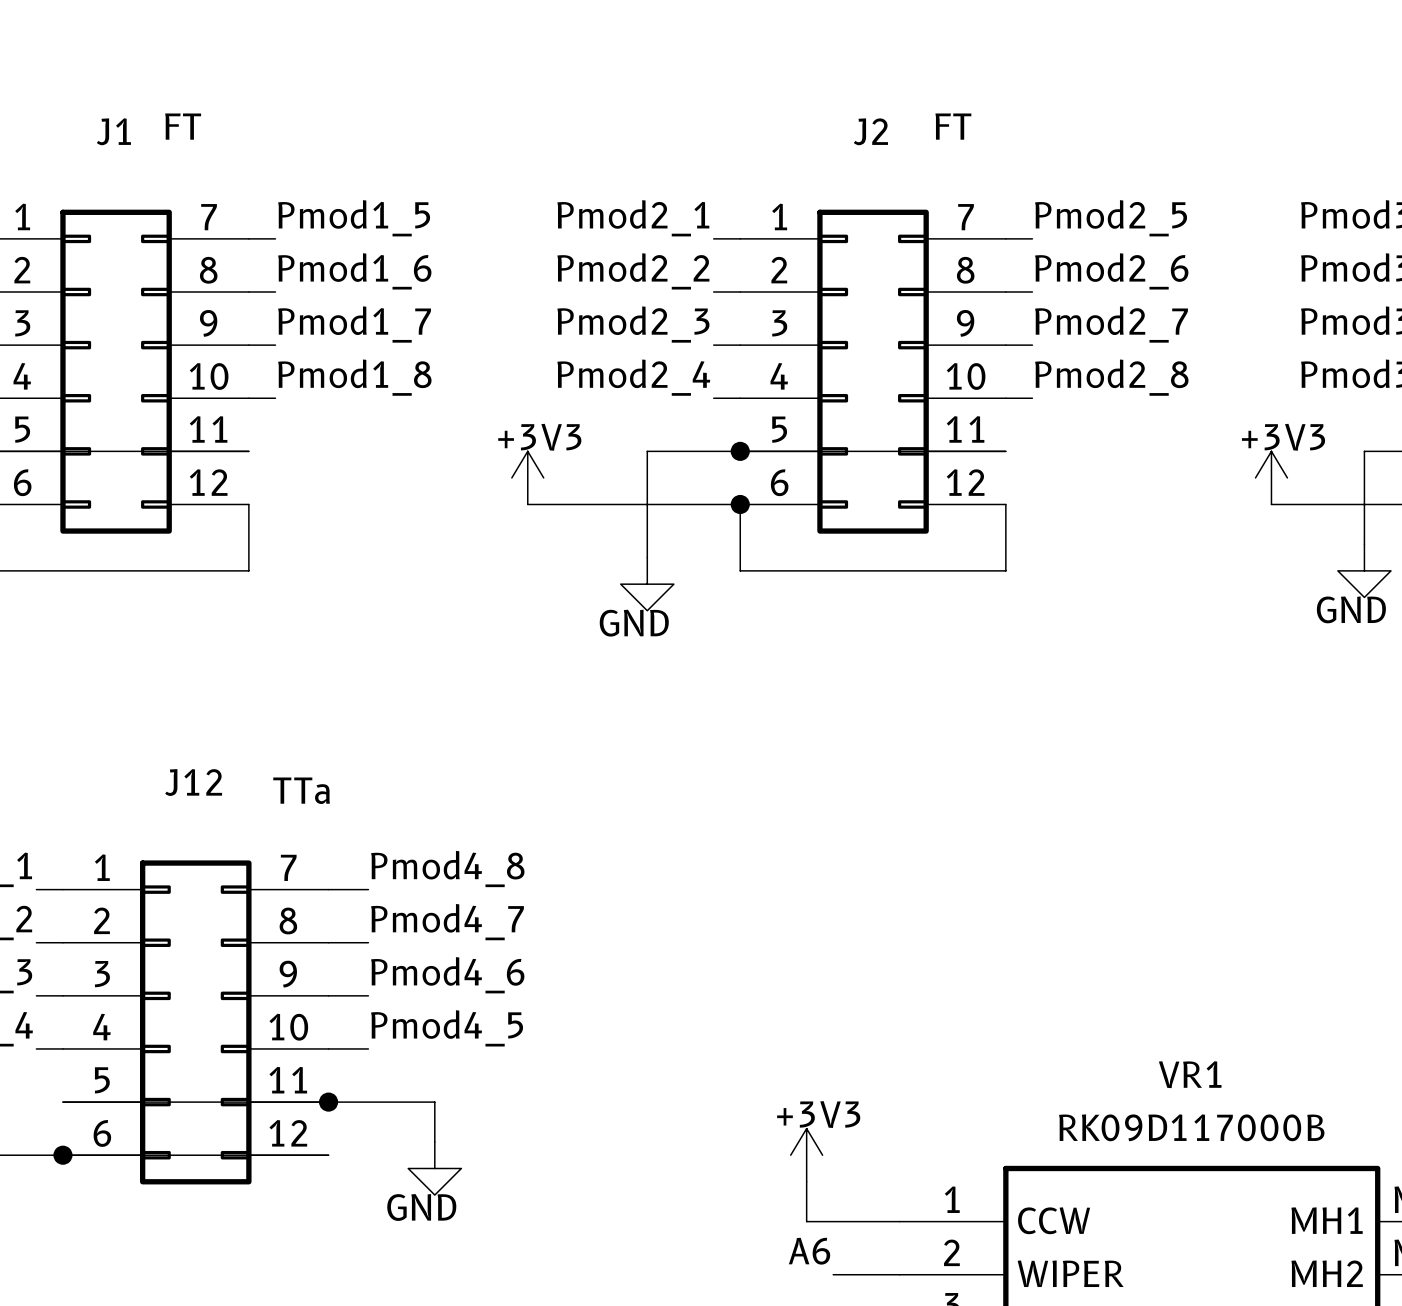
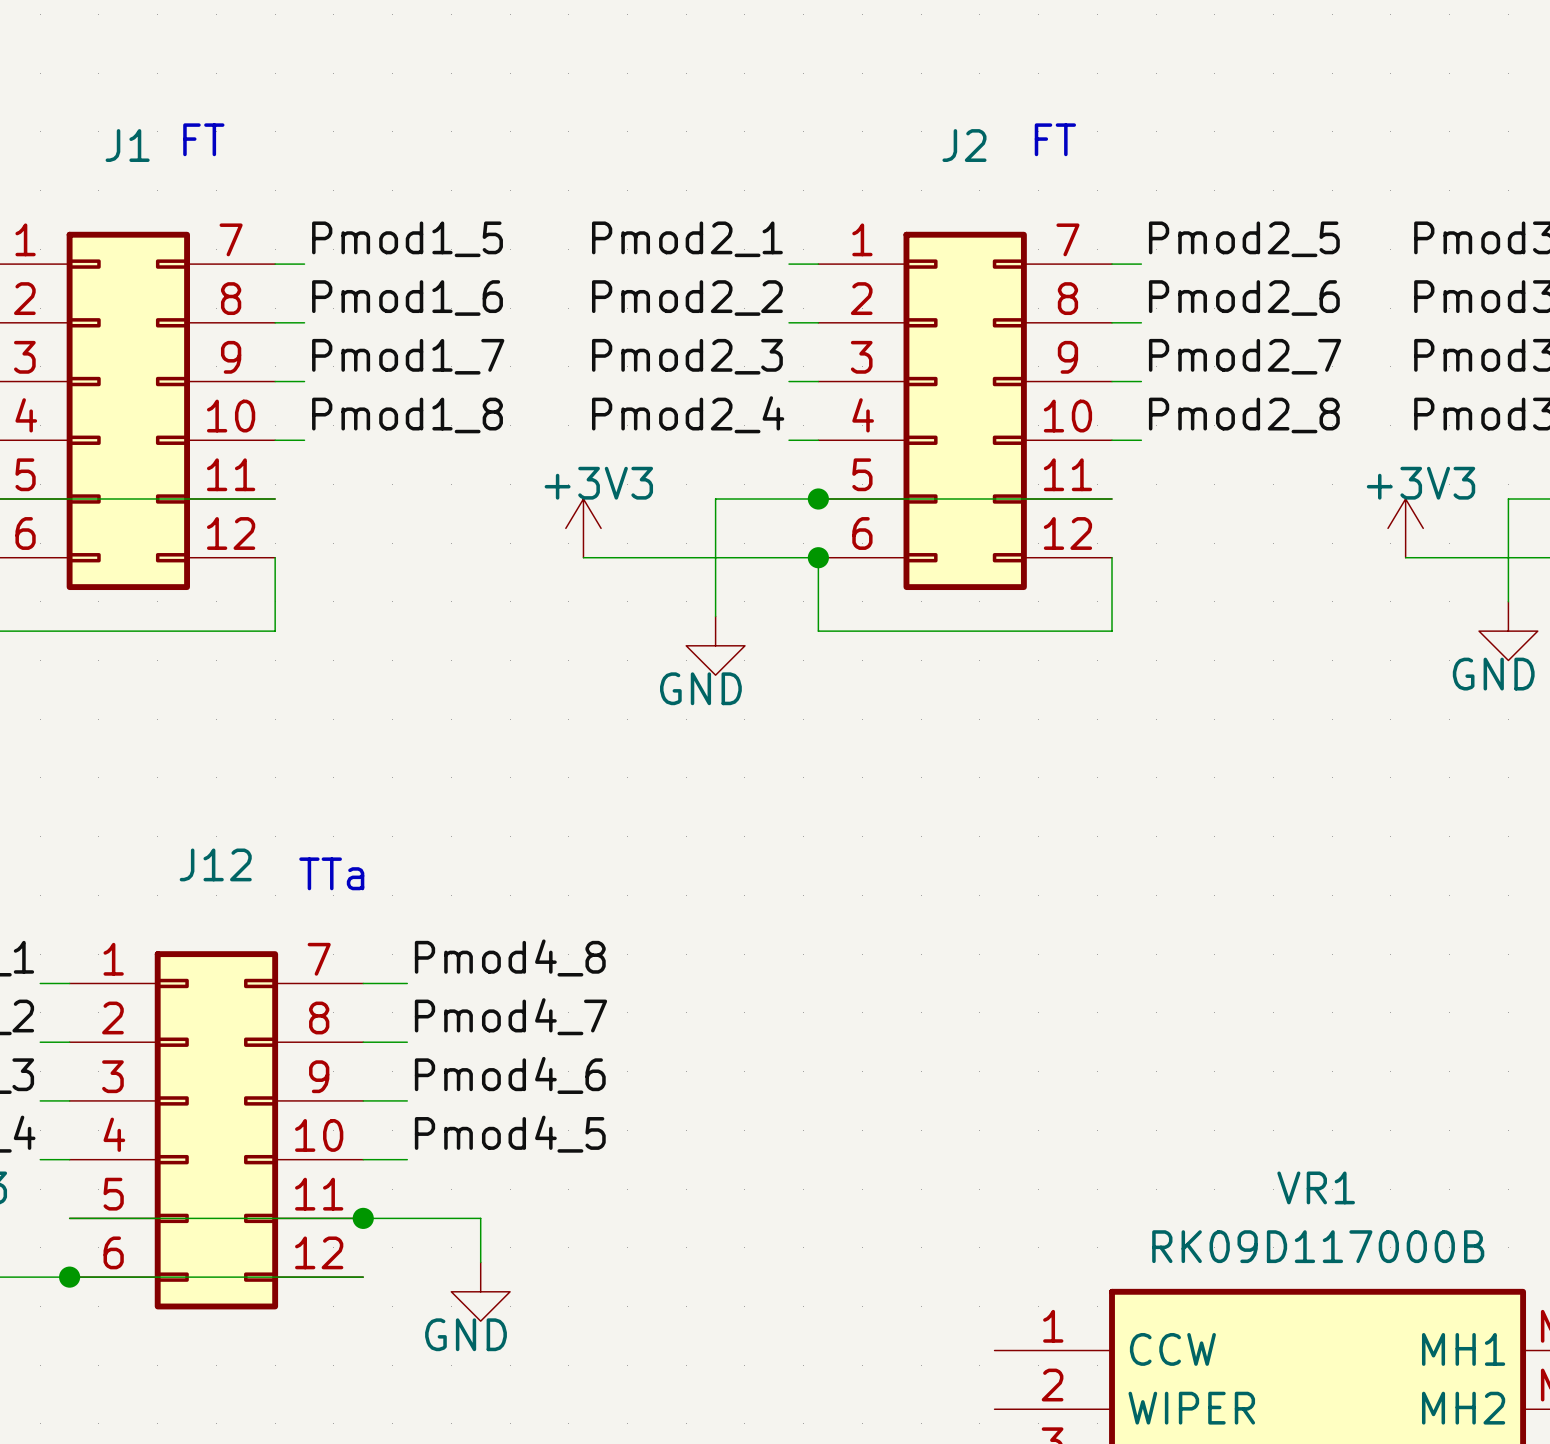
power symbol: +3V3 (806, 1155) -> none
wire: (806, 1181) (806, 1221) (899, 1221) -> none
label: A6 (809, 1251) -> none
wire: (833, 1274) (899, 1274) -> none

